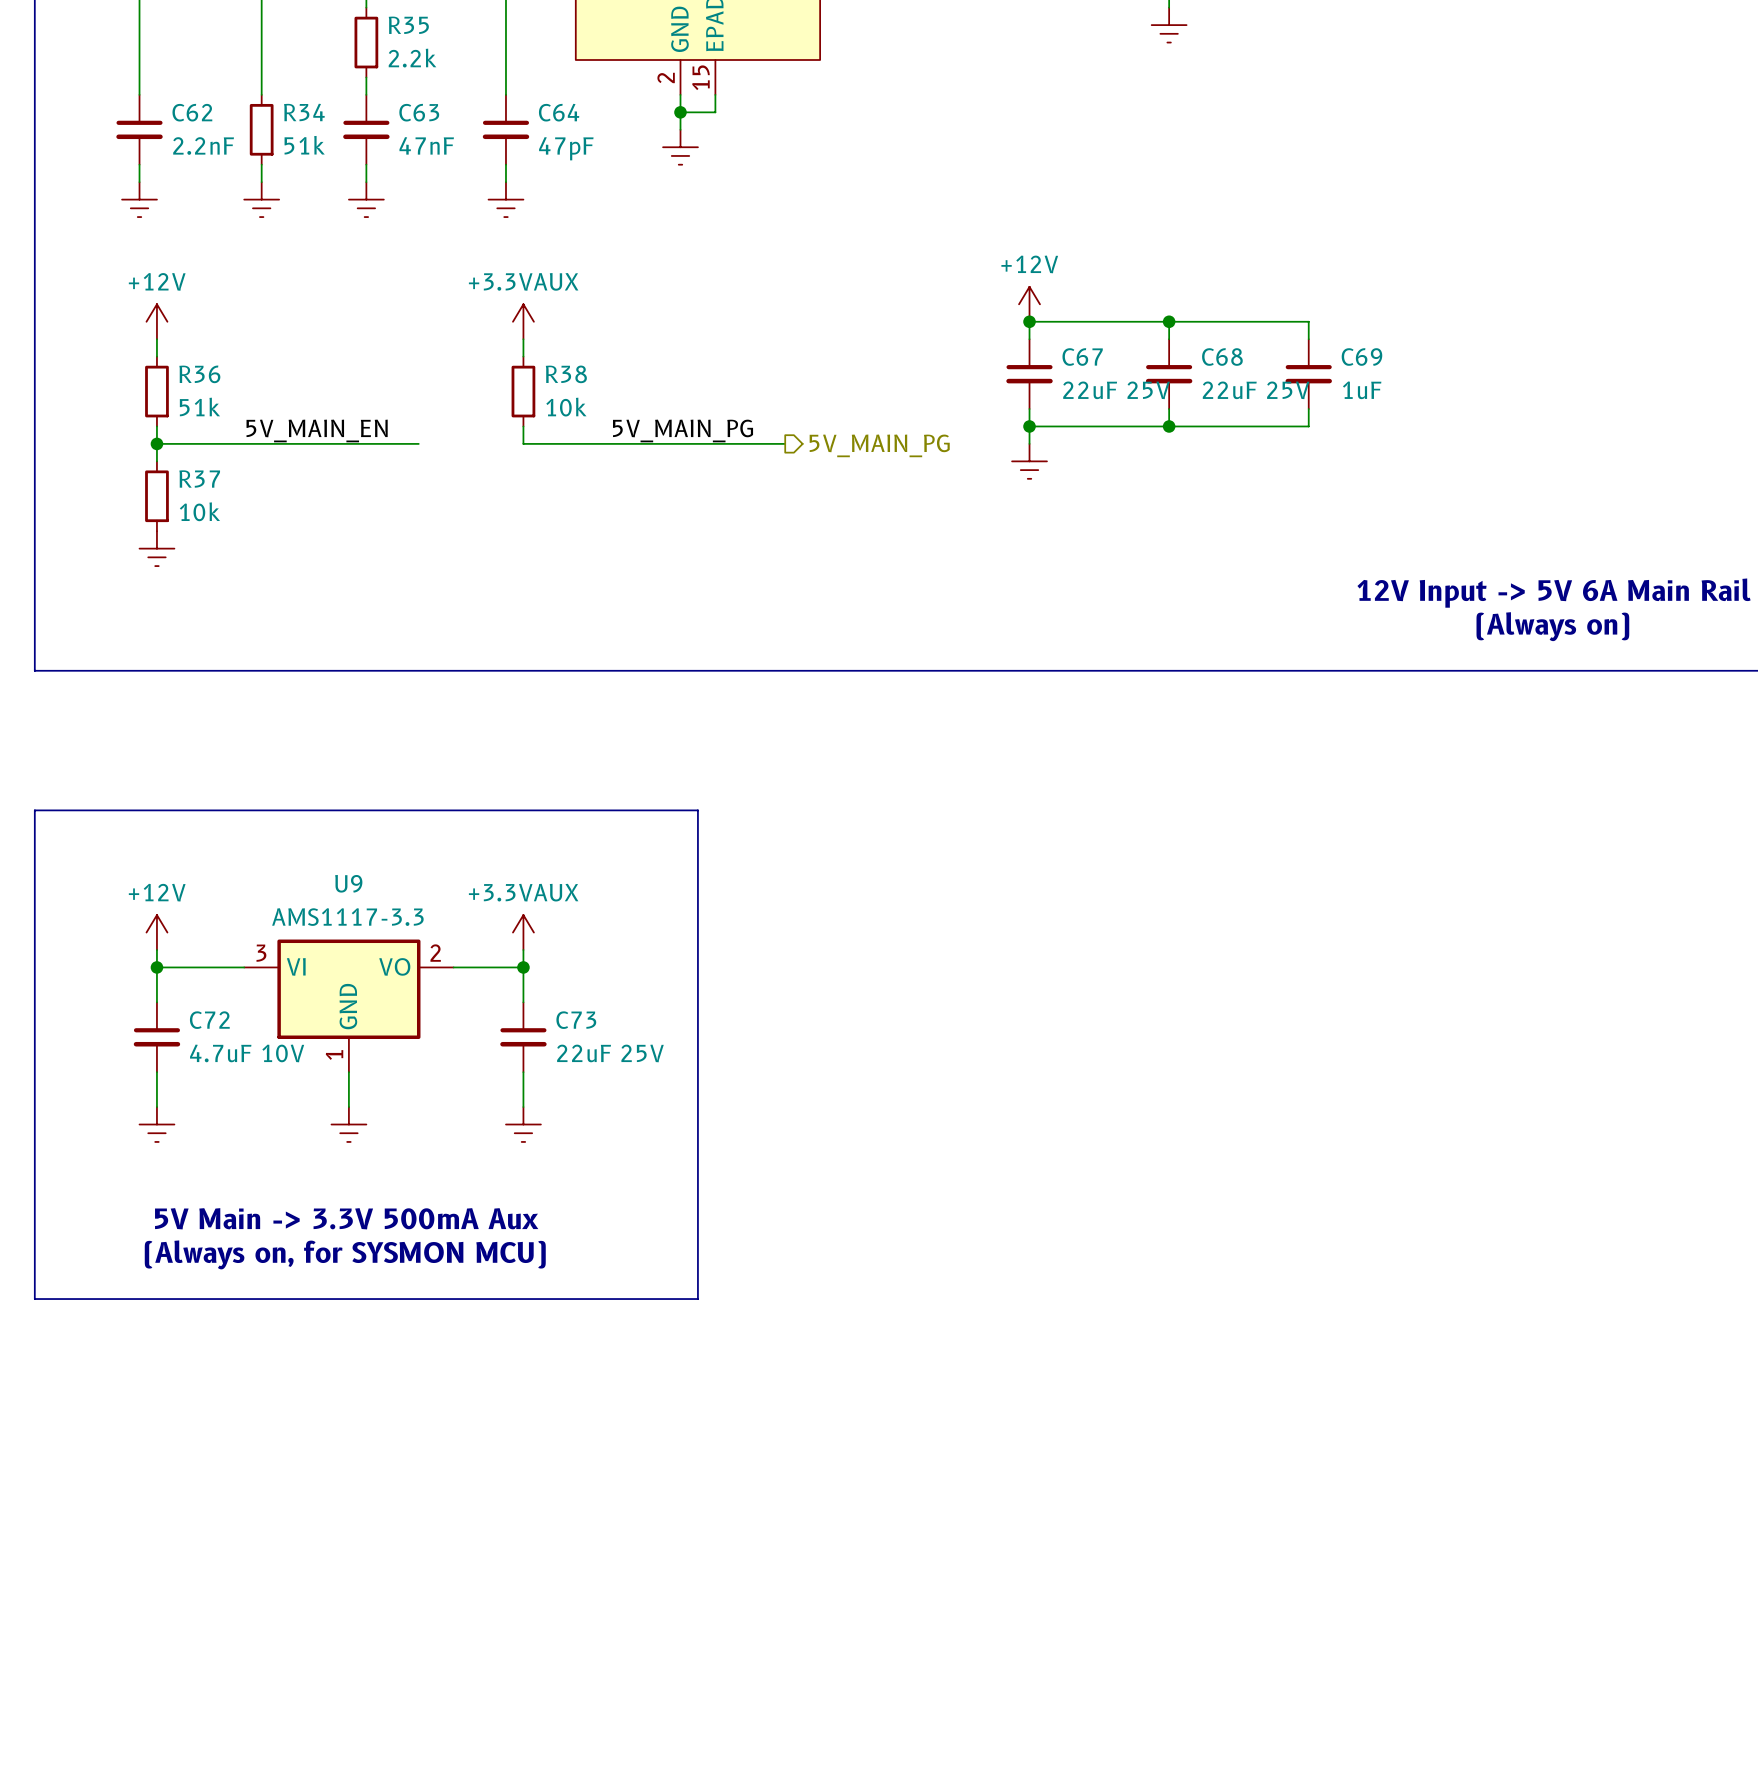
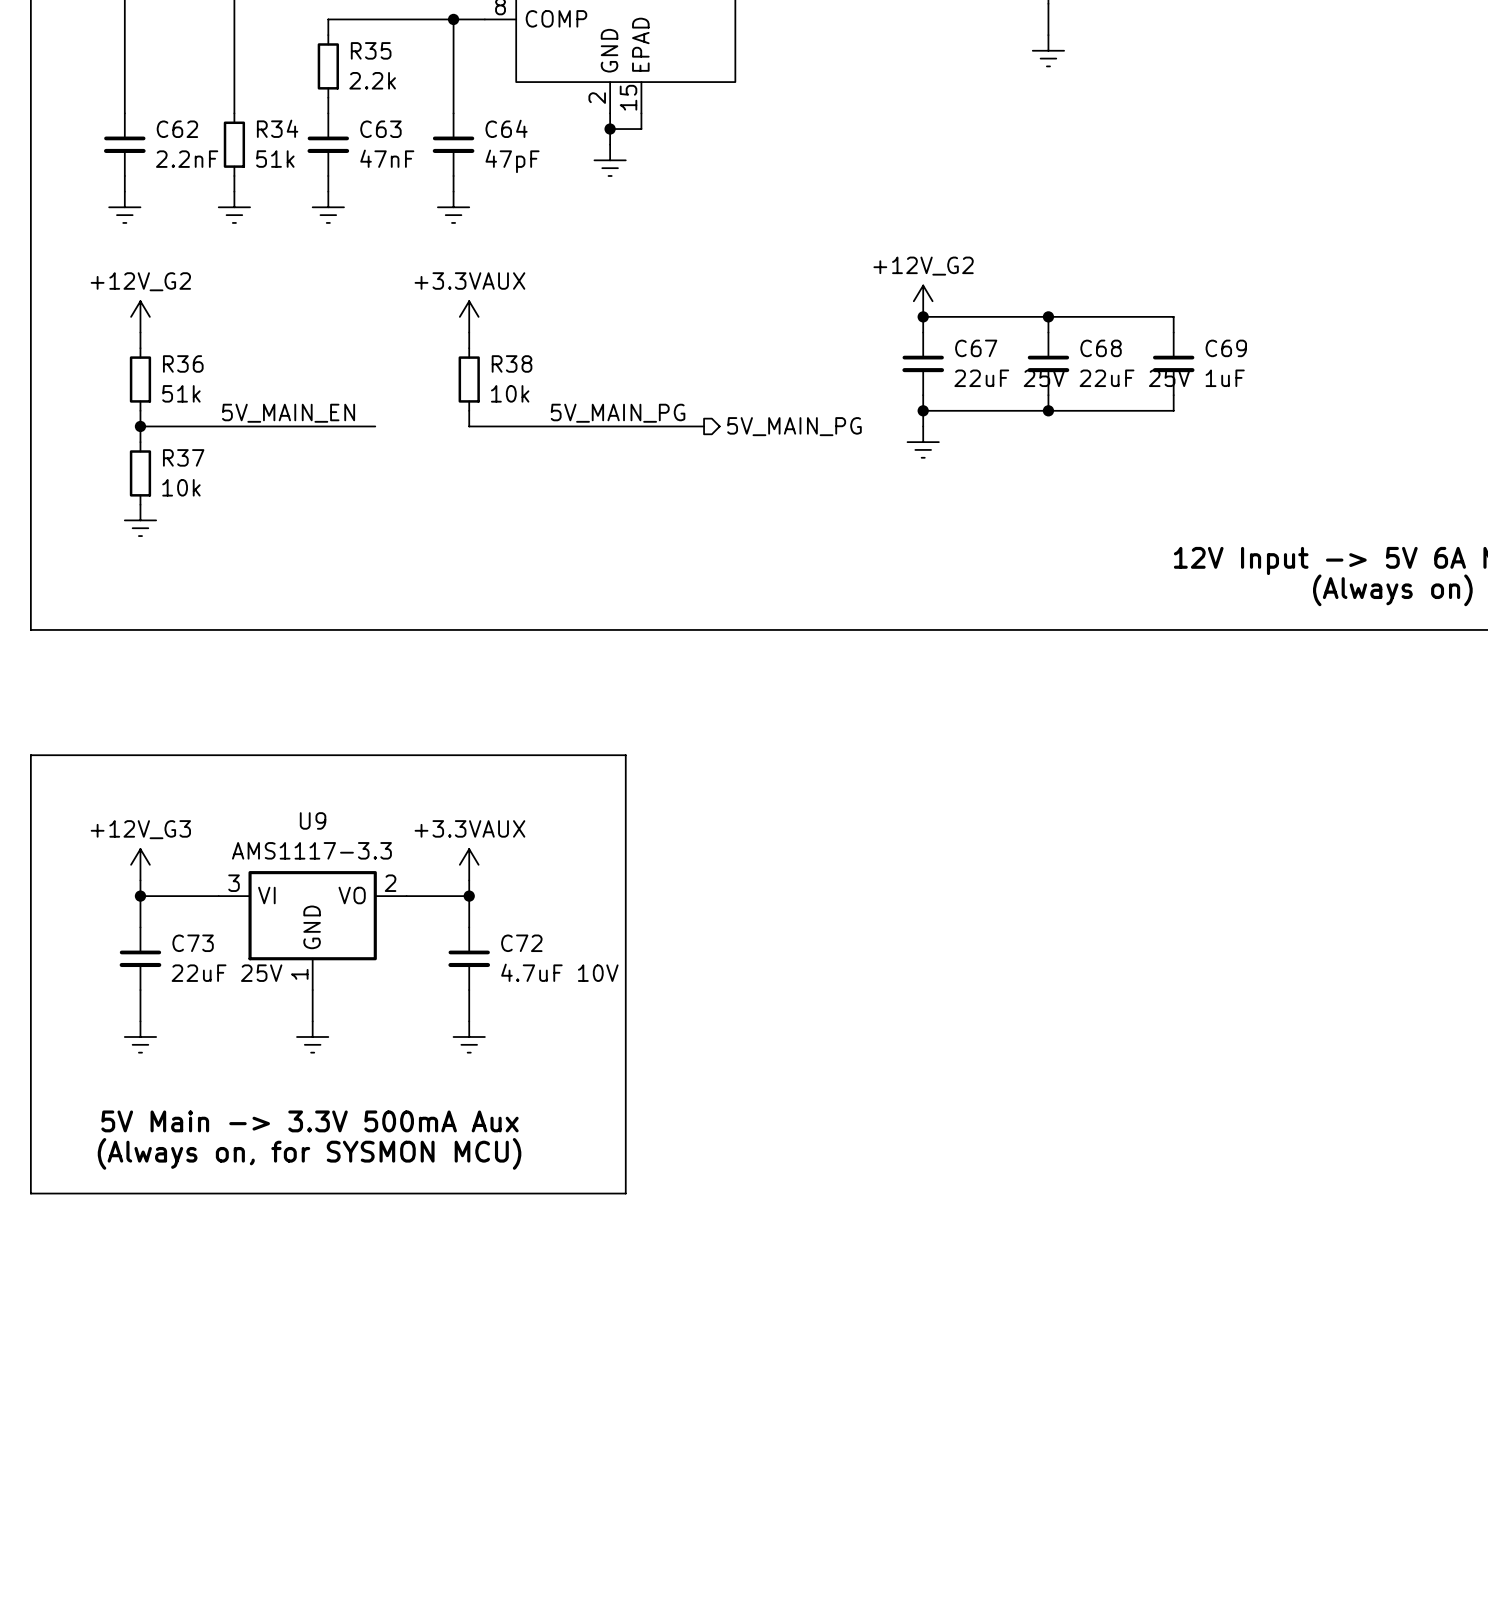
power symbol: +12V (1029, 304) -> +12V_G2 (923, 301)
power symbol: +12V (156, 321) -> +12V_G2 (140, 316)
power symbol: +12V (156, 932) -> +12V_G3 (140, 864)
C72 name: C72 (209, 1020) -> C73 (193, 943)
C73 name: C73 (576, 1020) -> C72 (521, 943)
C72 value: 4.7uF 10V (247, 1053) -> 22uF 25V (227, 973)
C73 value: 22uF 25V (610, 1053) -> 4.7uF 10V (559, 972)

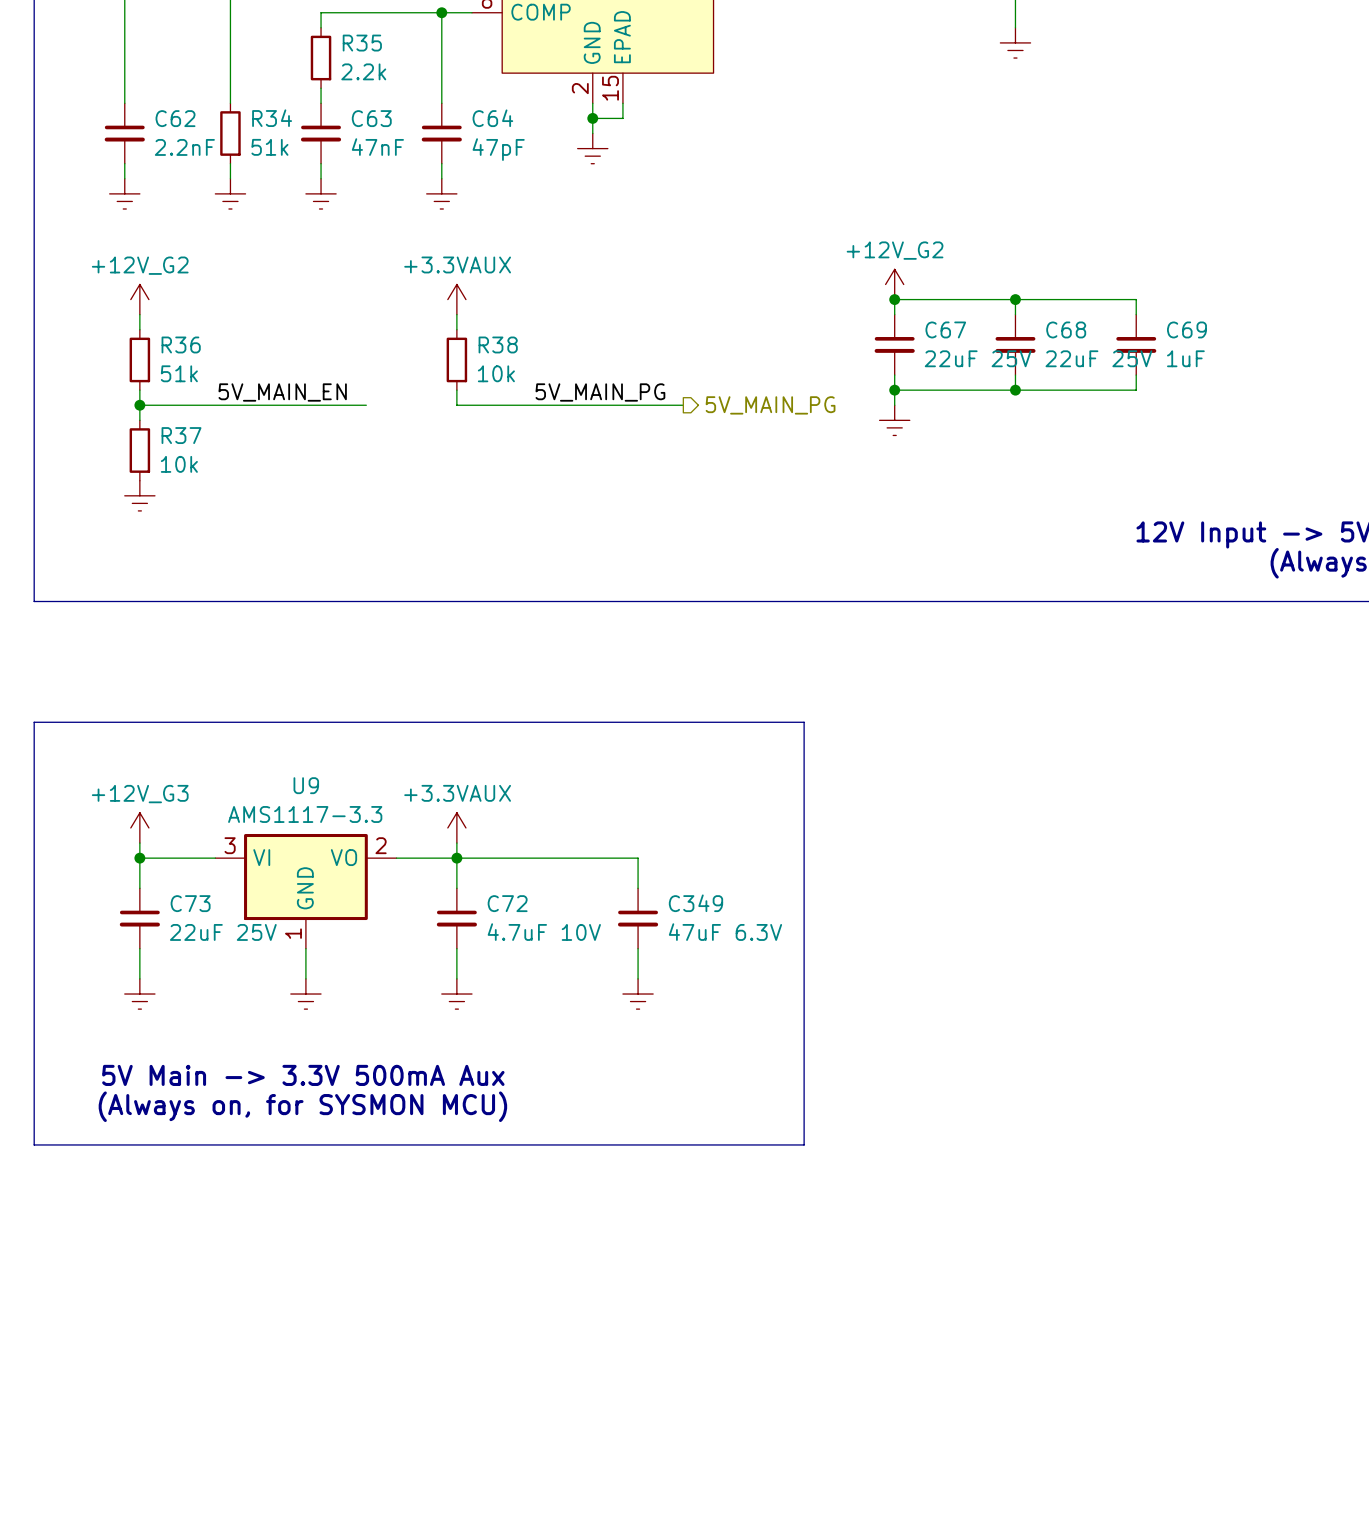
line: (625, 755) (625, 1193) -> (607, 722) (804, 722) (804, 1144) (607, 1144)
wire: none -> (456, 858) (638, 858) (638, 888)
C349: none -> 47uF 6.3V (638, 918)
wire: none -> (638, 948) (638, 978)
power symbol: none -> (638, 994)

